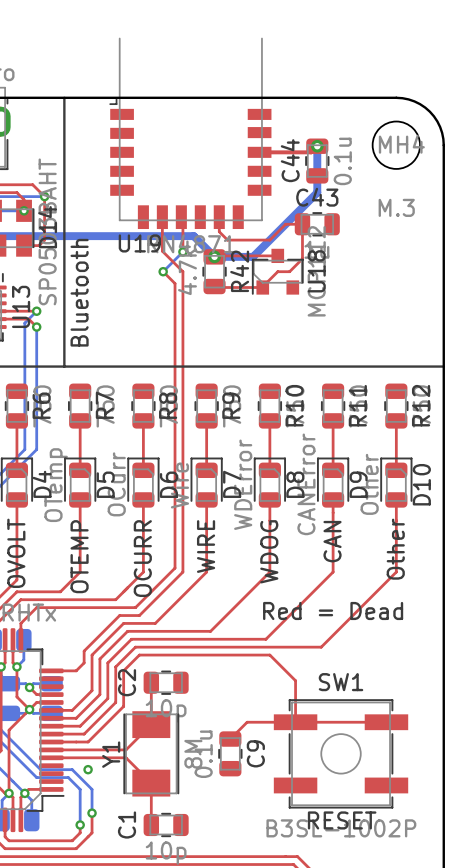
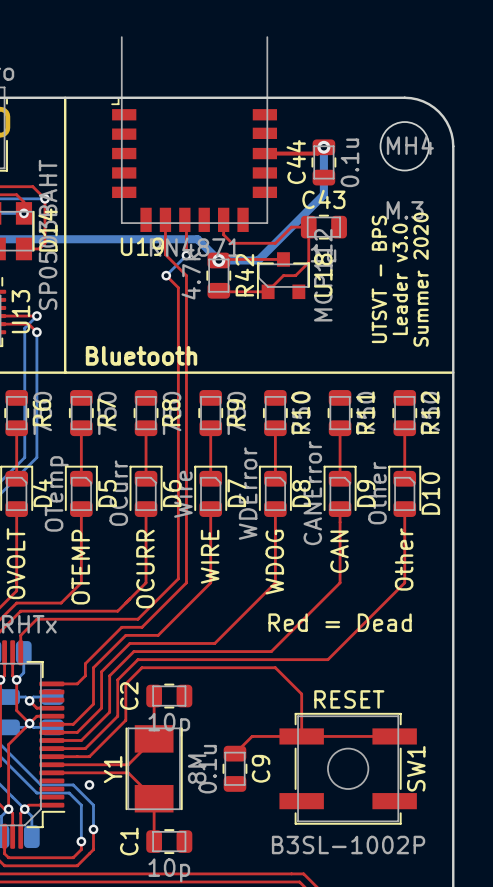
text: none -> UTSVT - BPS (379, 279)
text: none -> Leader v3.0 (400, 279)
text: none -> Summer 2020 (421, 279)
text rotation: 0° (79, 292) -> 90° clockwise (141, 355)
SW1 name rotation: 0° (341, 682) -> 90° counterclockwise (416, 768)
SW1 name position: SW1 (341, 682) -> SW1 (416, 768)
text position: RESET (342, 820) -> RESET (349, 699)

